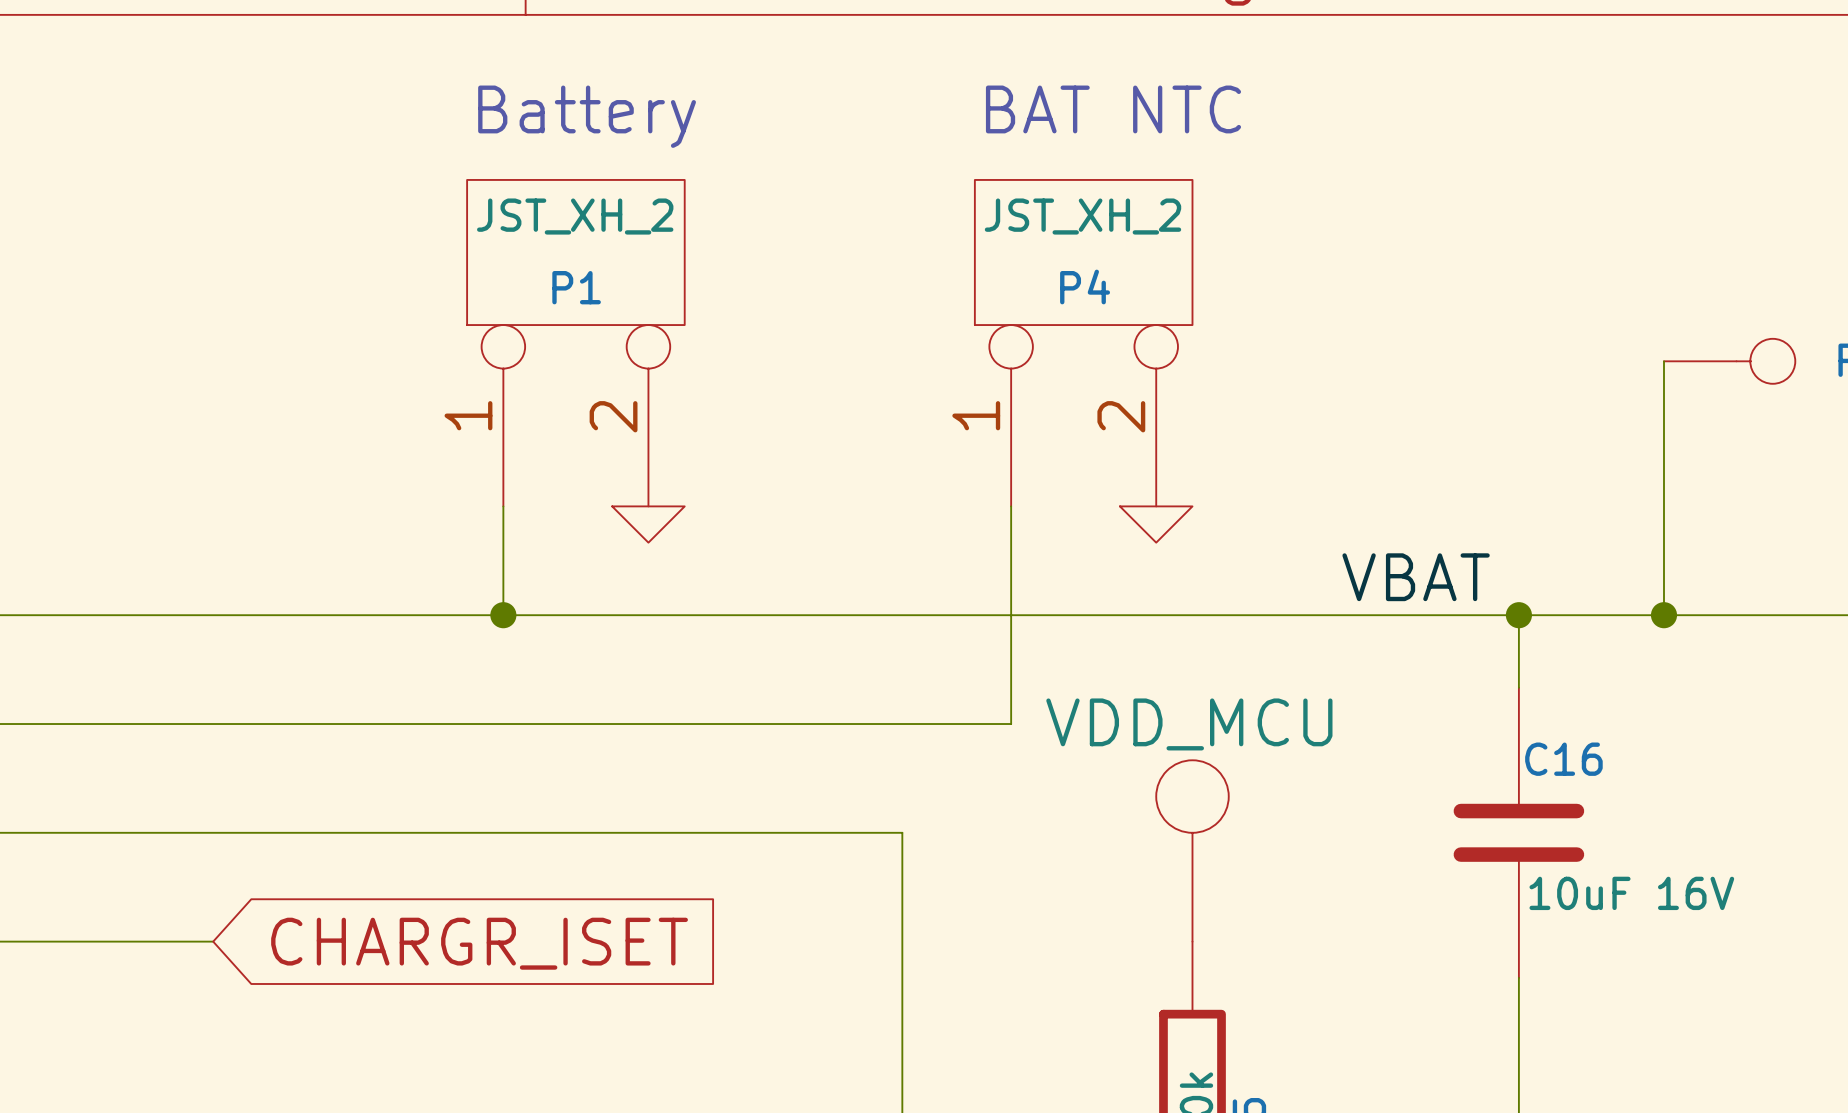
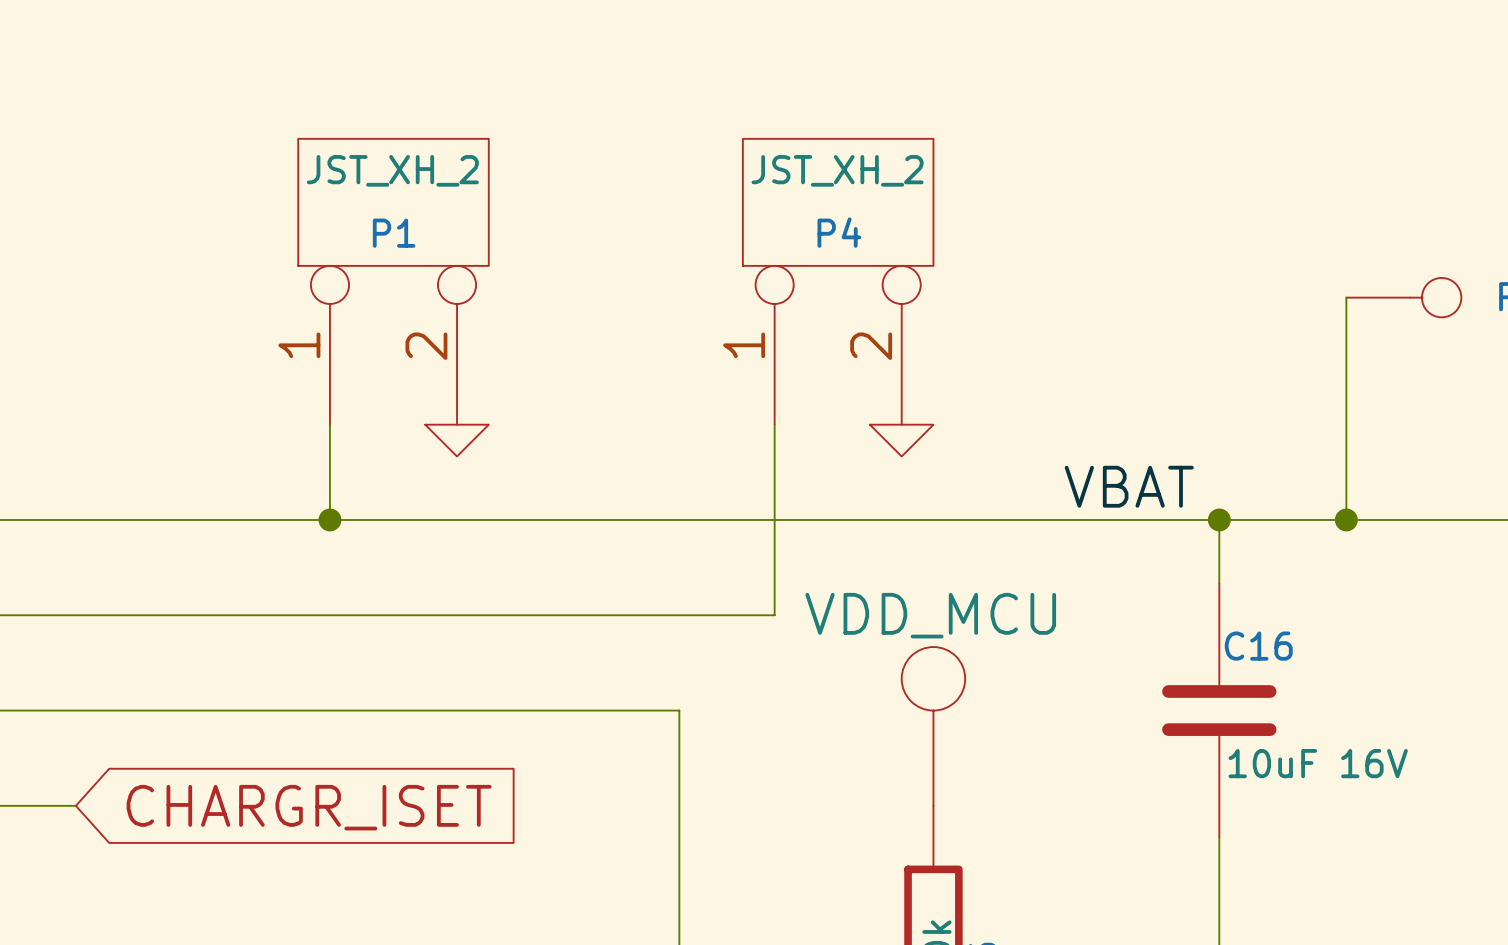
text: BAT NTC (1113, 109) -> none
text: Battery (587, 116) -> none

